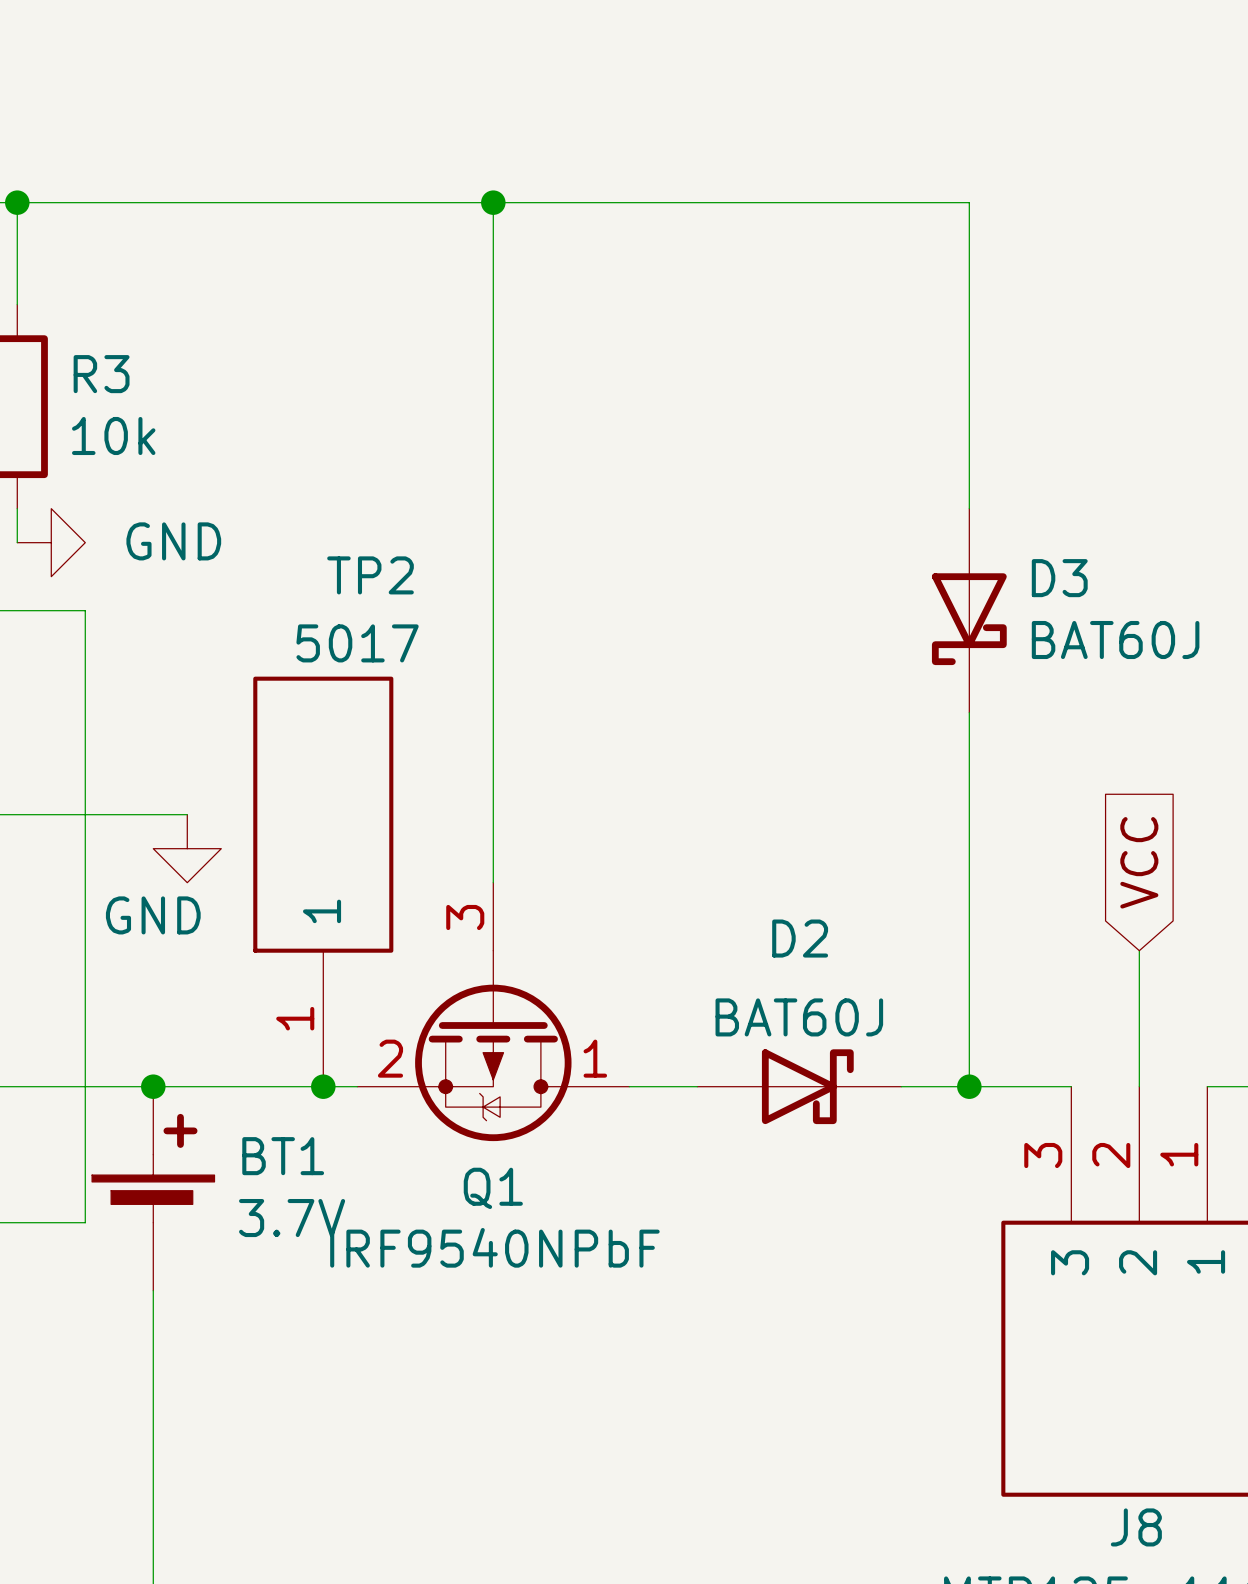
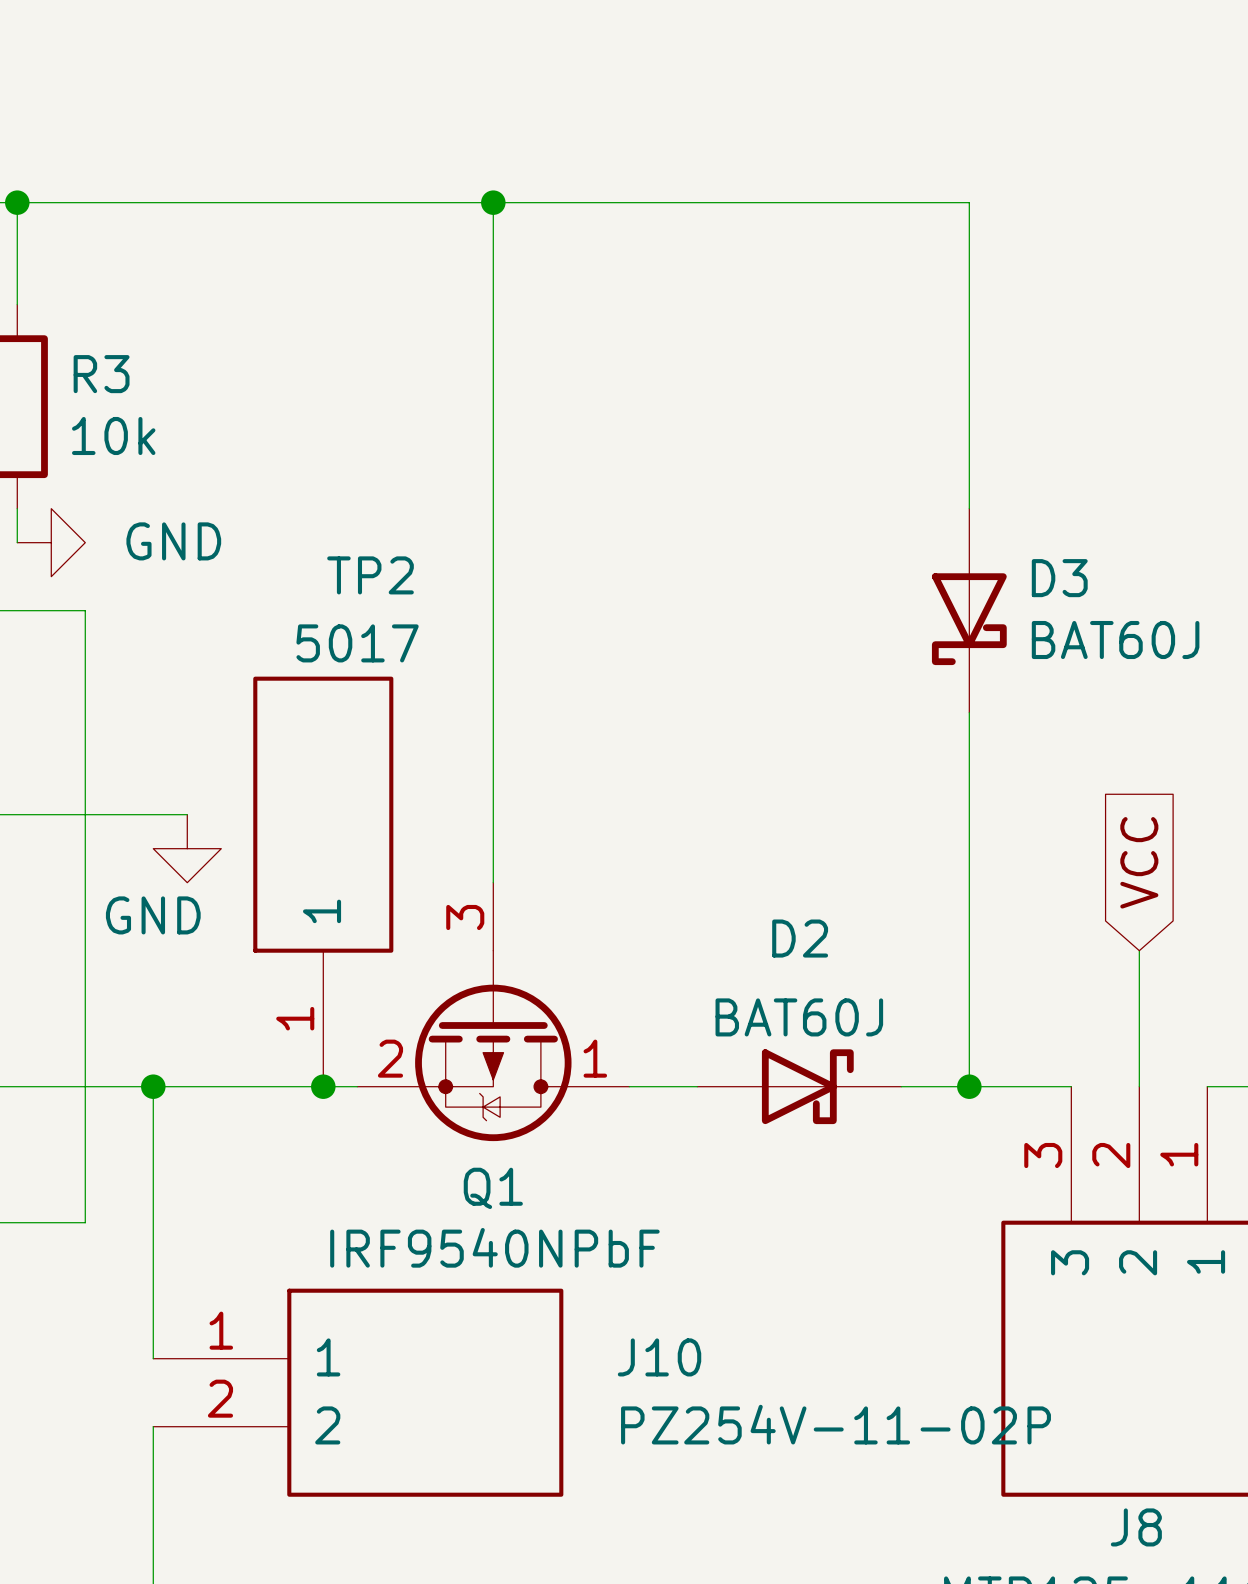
BT1: 3.7V (153, 1188) -> none
wire: (153, 1358) (153, 1426) -> none
J10: none -> PZ254V-11-02P (358, 1392)

